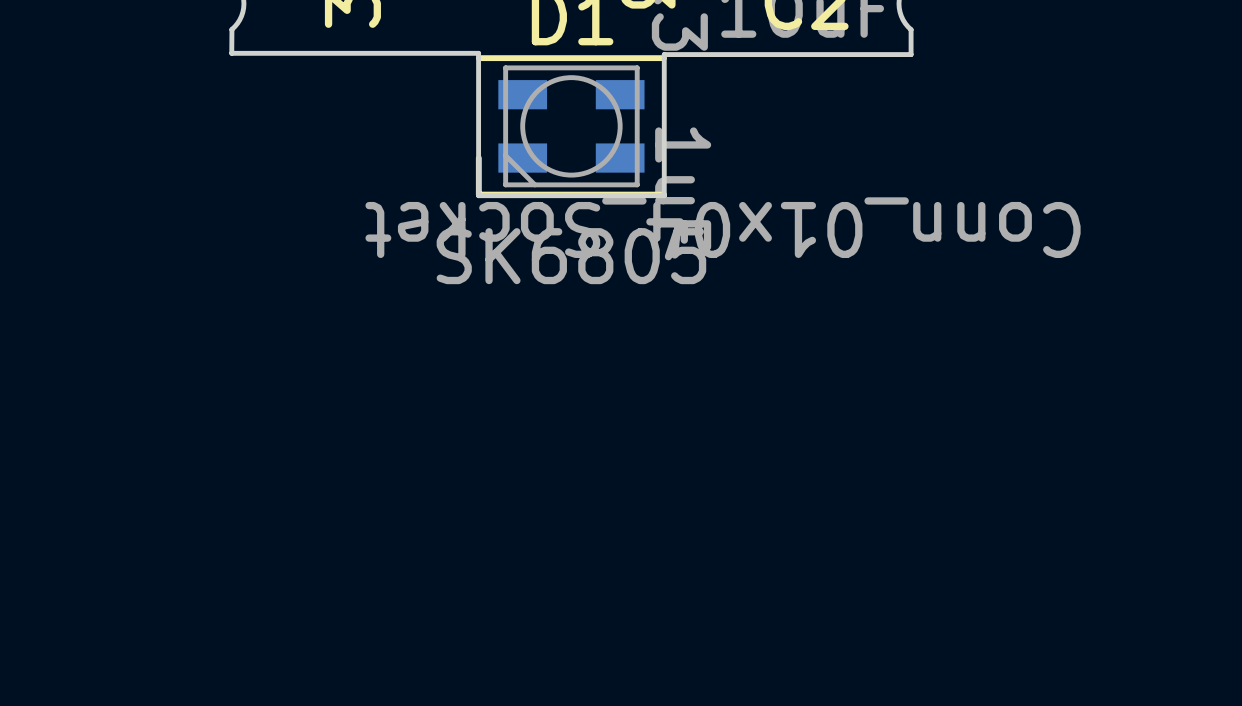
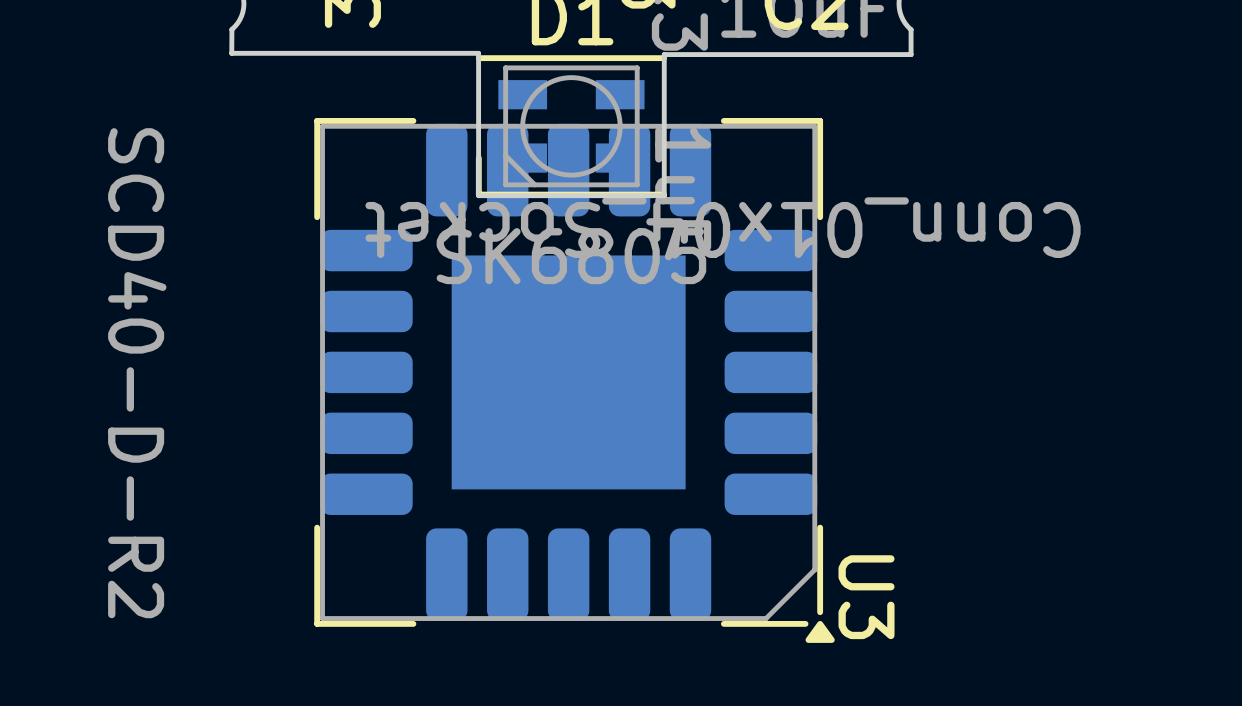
U3: none -> SCD40-D-R2 (574, 380)

